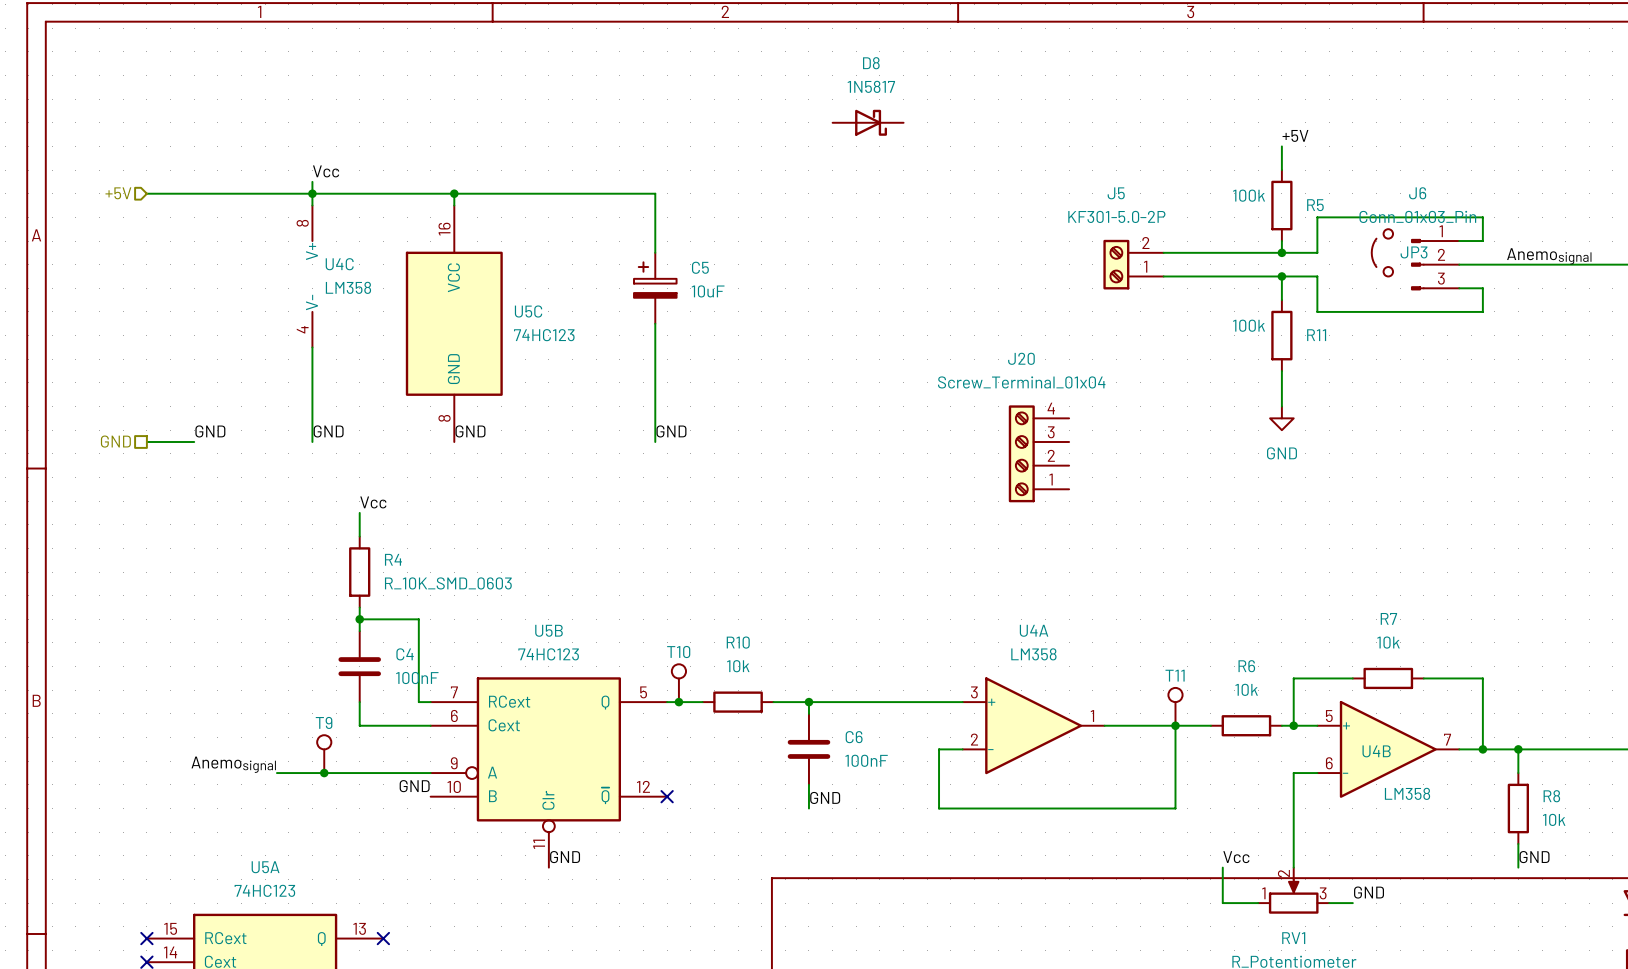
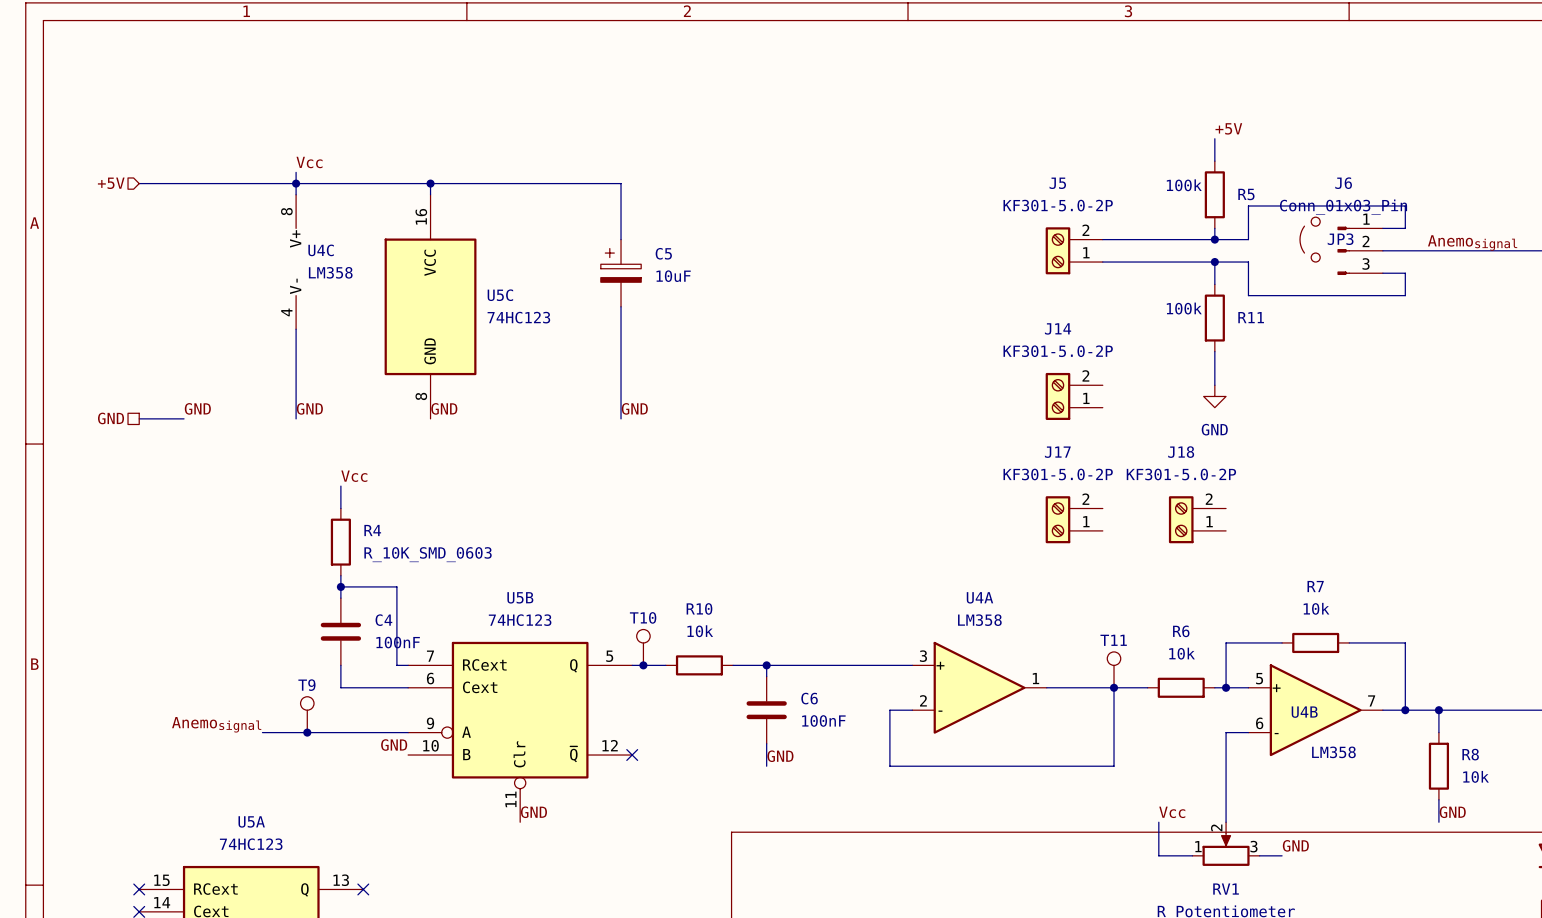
D8: 1N5817 (868, 122) -> none
J14: none -> KF301-5.0-2P (1074, 396)
J20: Screw_Terminal_01x04 (1038, 453) -> none
J17: none -> KF301-5.0-2P (1074, 519)
J18: none -> KF301-5.0-2P (1197, 519)

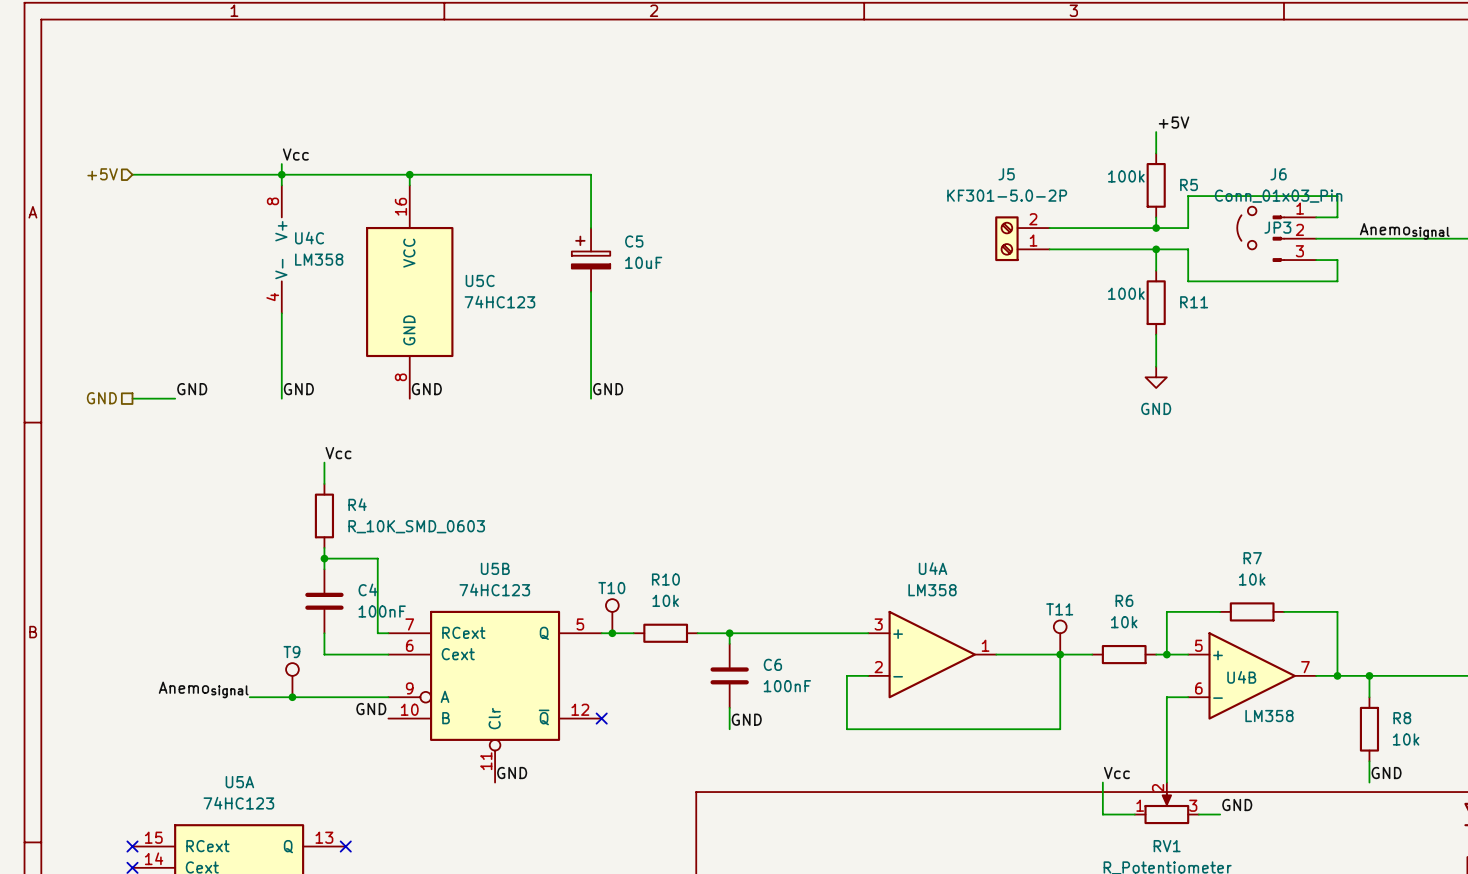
J14: KF301-5.0-2P (1074, 396) -> none
J17: KF301-5.0-2P (1074, 519) -> none
J18: KF301-5.0-2P (1197, 519) -> none

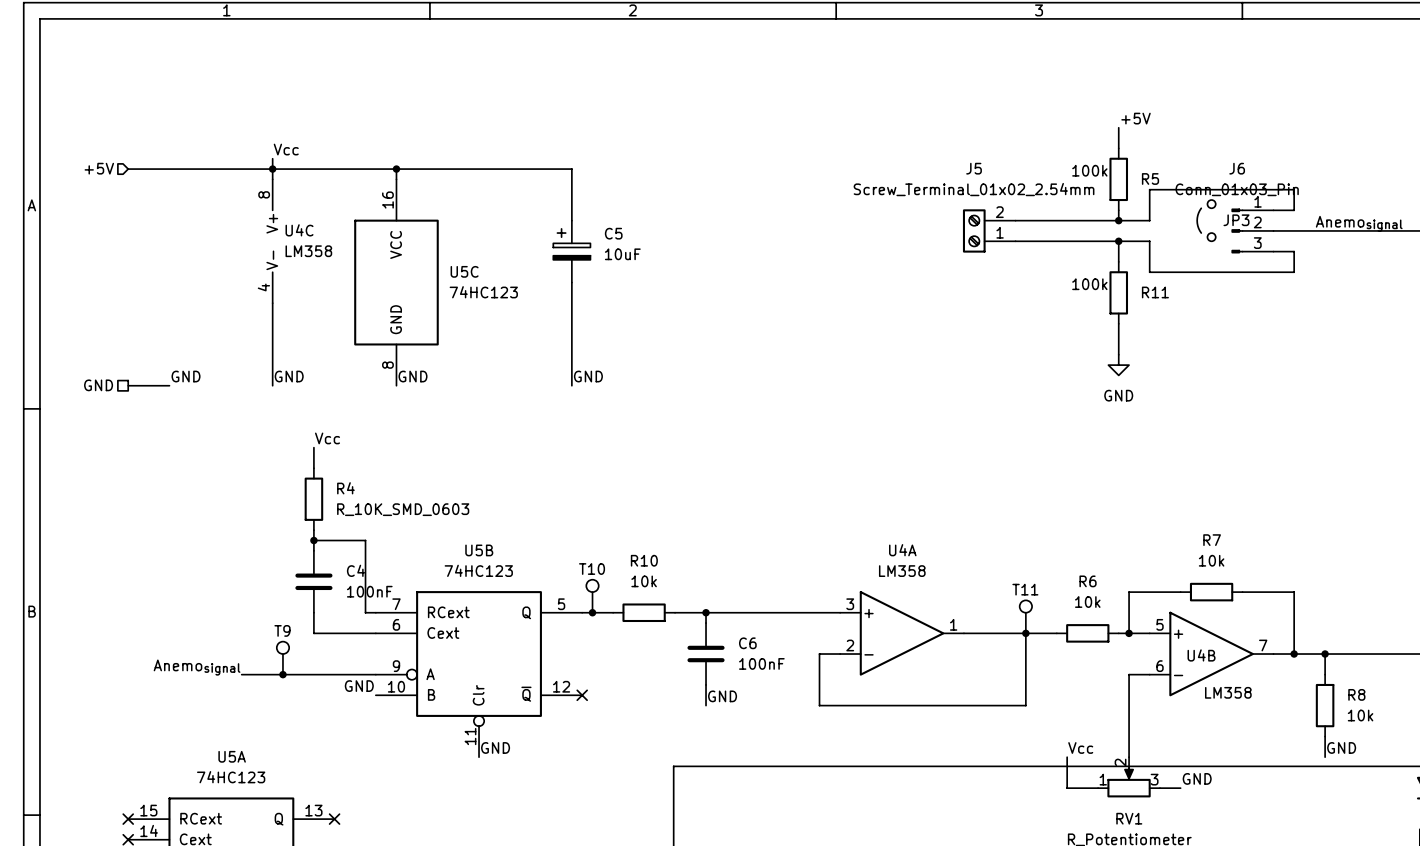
J5 value: KF301-5.0-2P (1007, 195) -> Screw_Terminal_01x02_2.54mm (974, 189)

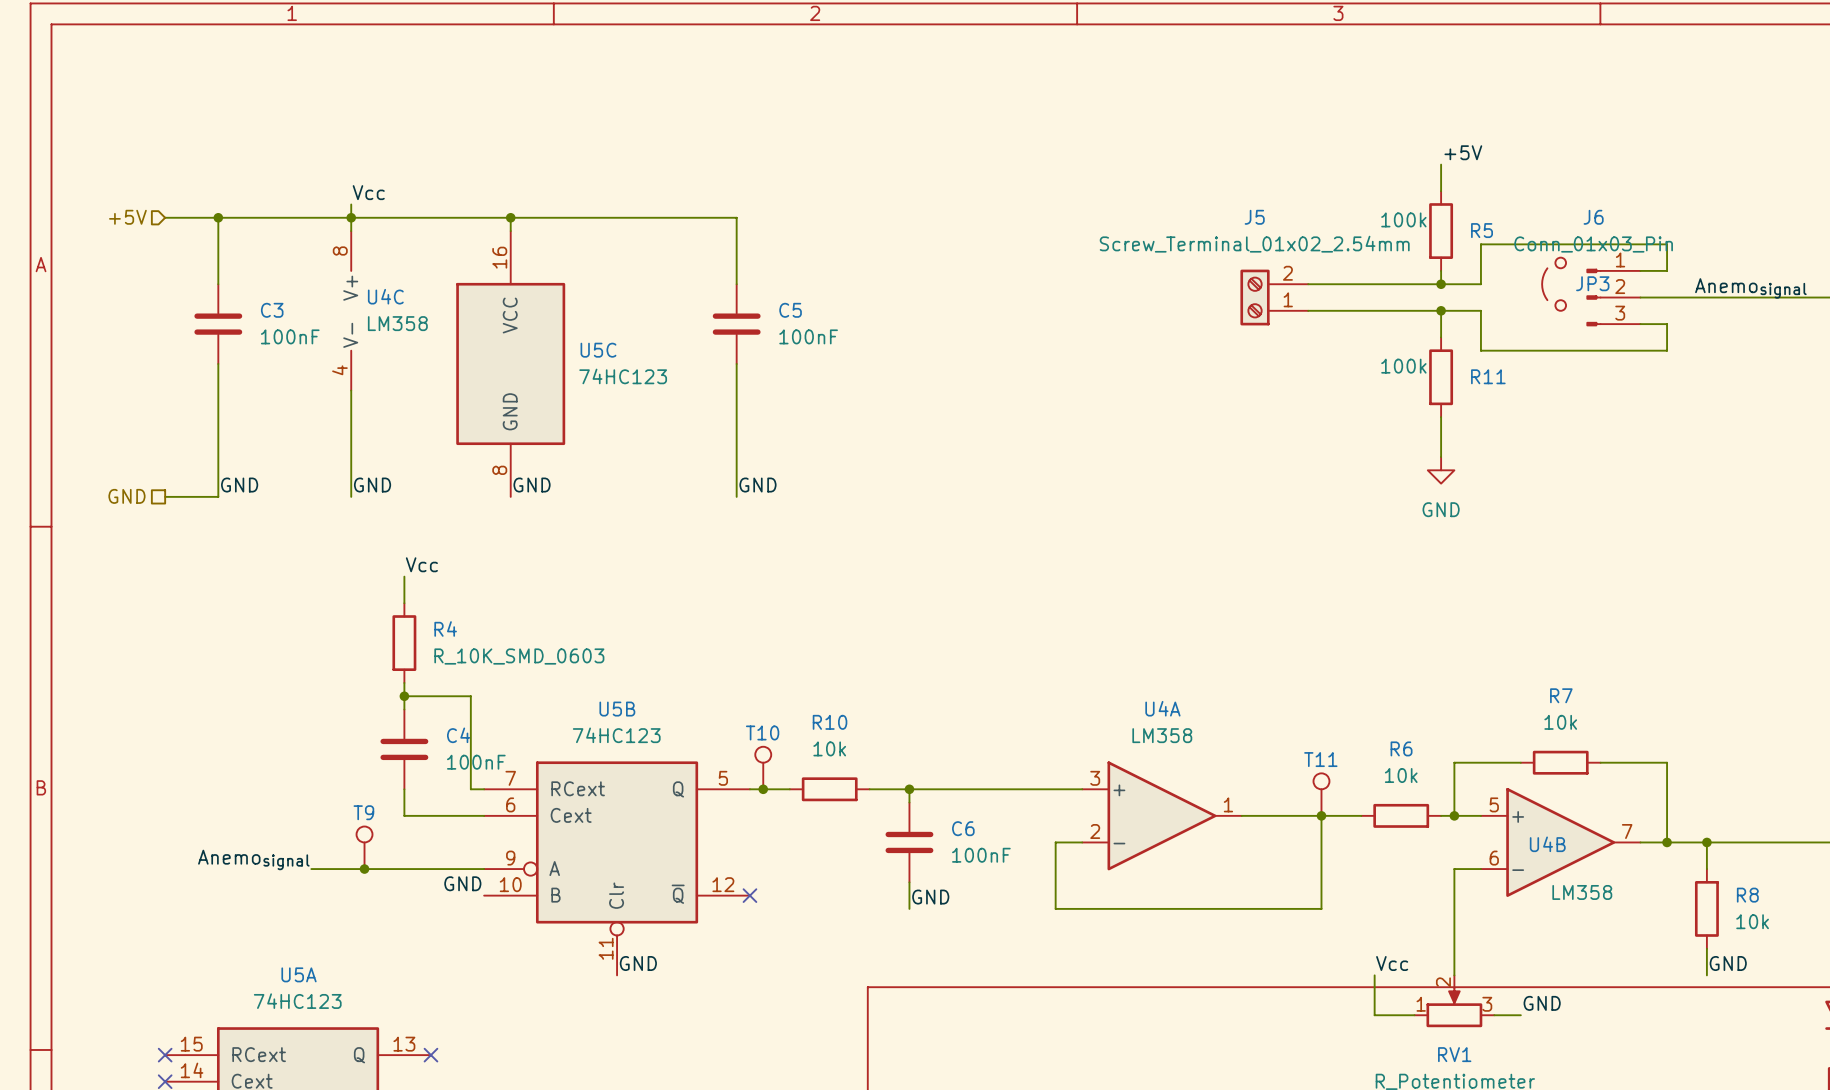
wire: none -> (218, 217) (218, 284)
junction: none -> (218, 217)
C5 symbol: [553, 220, 591, 283] -> [712, 284, 761, 364]
C3: none -> 100nF (218, 324)
C5 value: 10uF (622, 254) -> 100nF (808, 336)
wire: none -> (218, 363) (218, 496)

